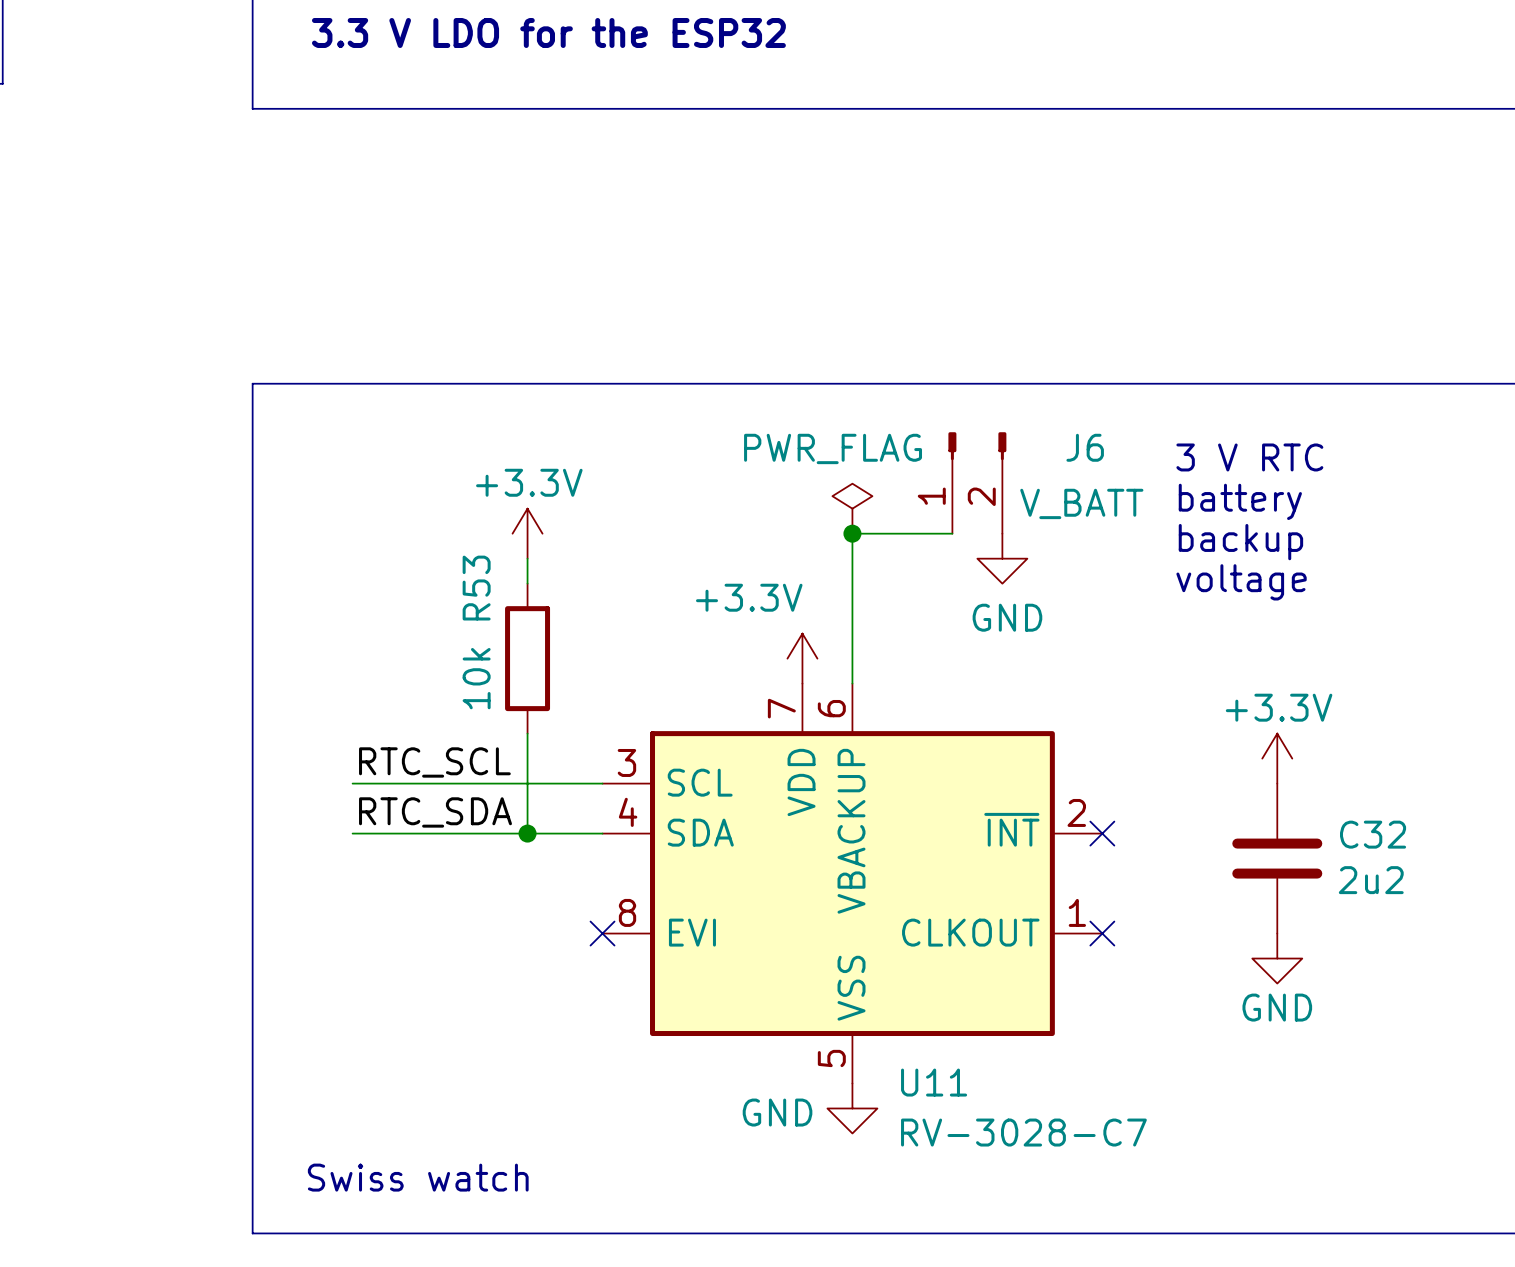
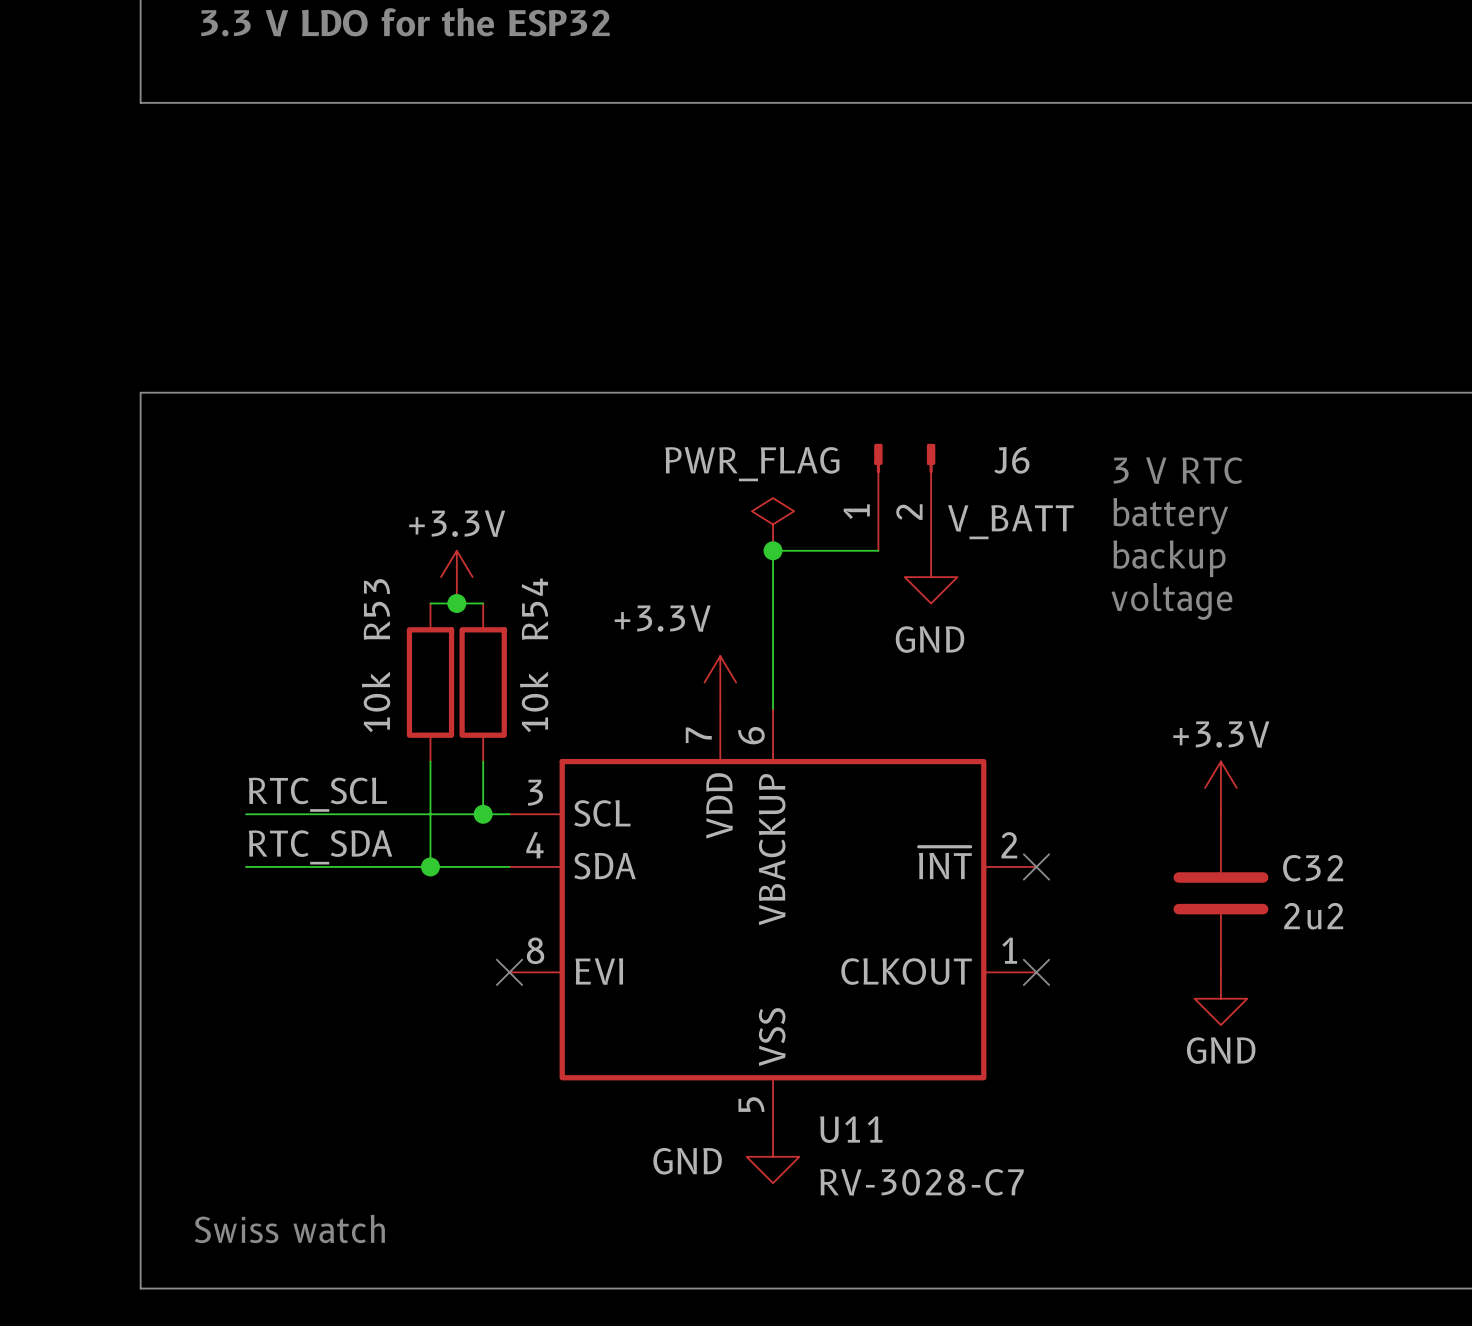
power symbol position: +3.3V (527, 533) -> +3.3V (456, 577)
wire: (527, 558) (527, 583) -> (483, 603) (430, 603)
junction: none -> (456, 603)
R54: none -> 10k (483, 682)
wire: none -> (483, 761) (483, 814)
junction: none -> (483, 814)

